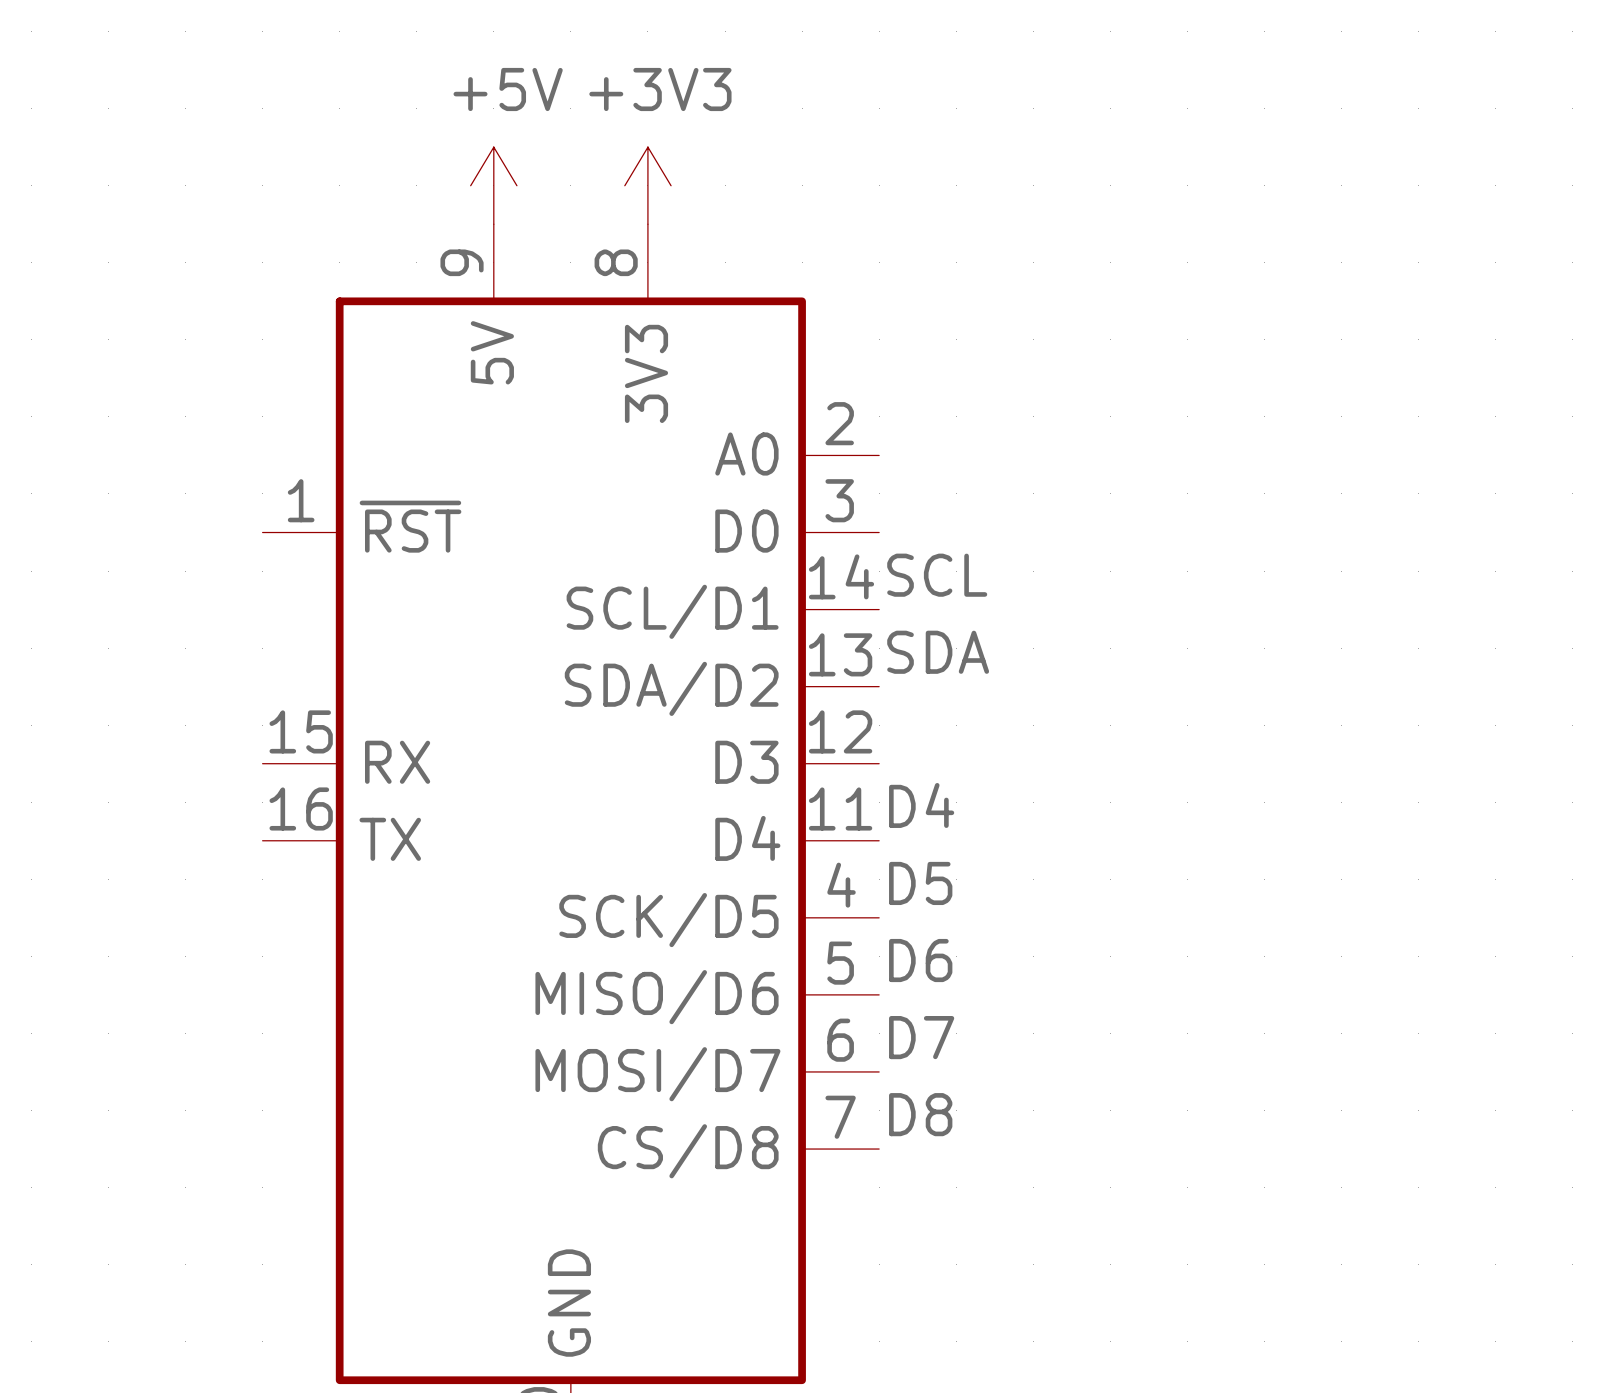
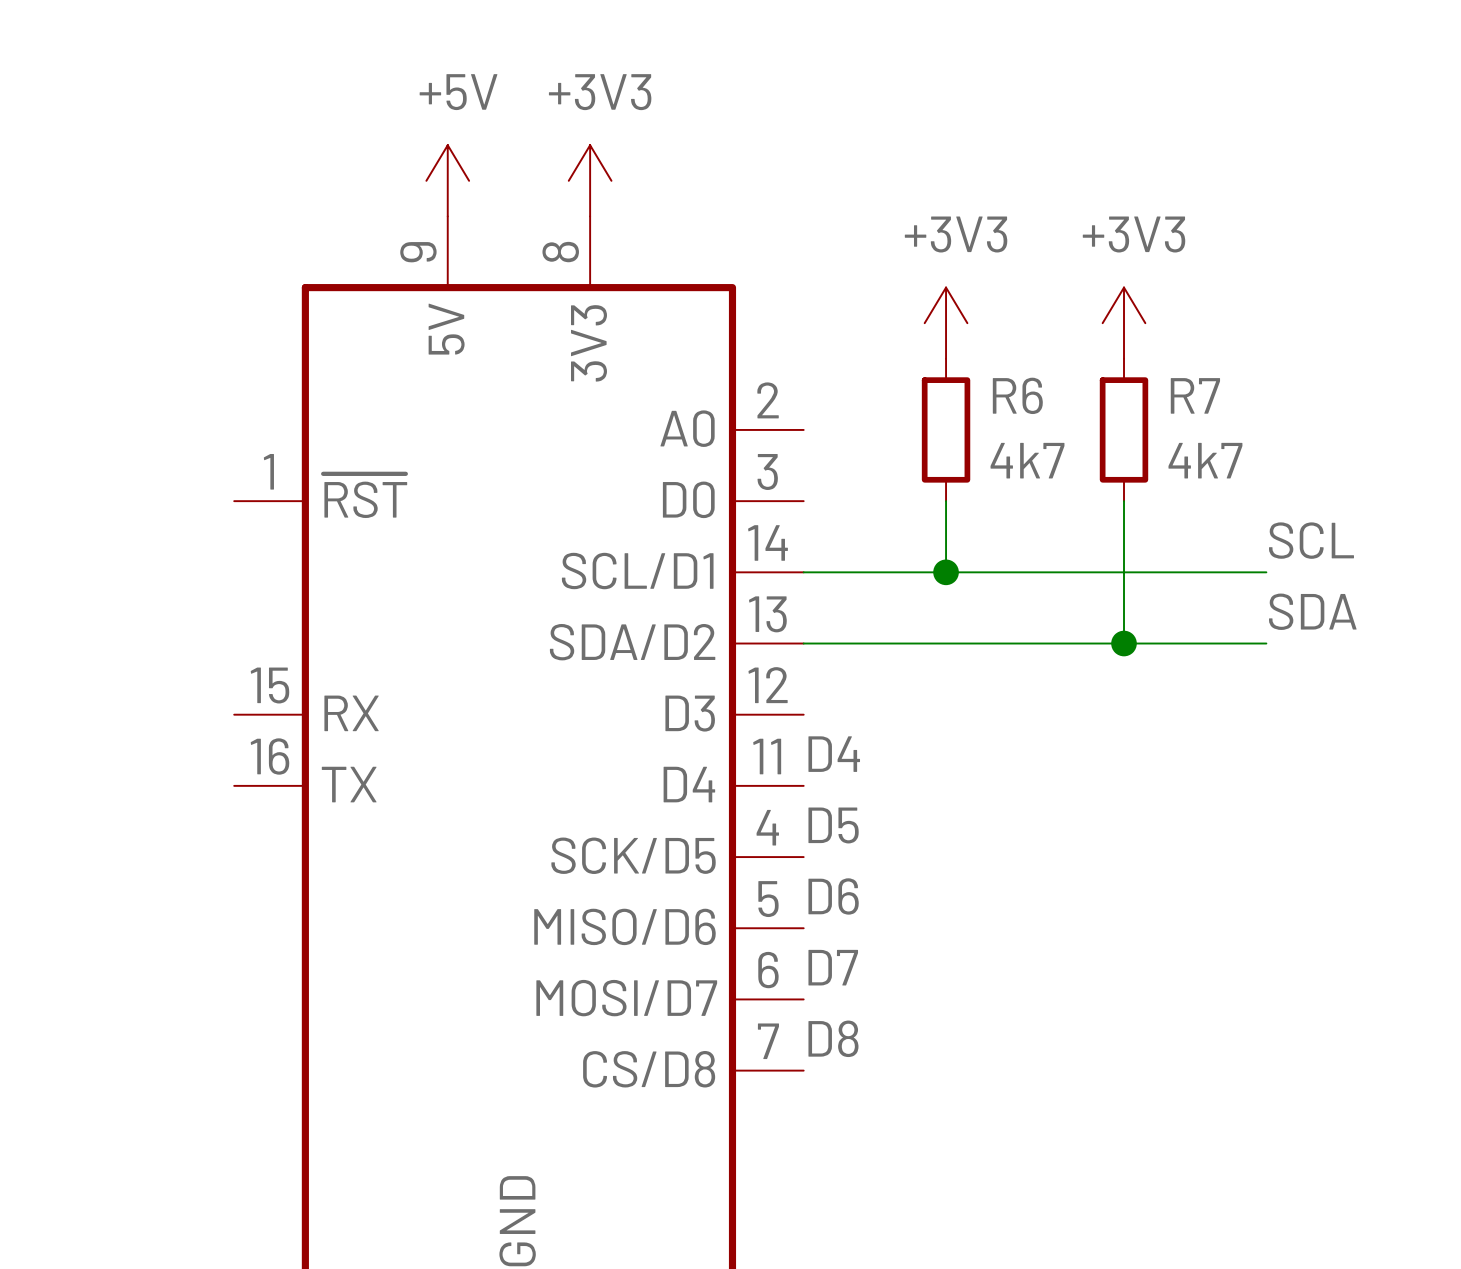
power symbol: none -> +3V3 (946, 323)
power symbol: none -> +3V3 (1124, 323)
R6: none -> 4k7 (946, 429)
R7: none -> 4k7 (1124, 429)
wire: none -> (946, 501) (946, 572)
wire: none -> (1124, 501) (1124, 643)
label position: SCL (937, 575) -> SCL (1311, 540)
wire: none -> (803, 572) (1266, 572)
junction: none -> (946, 572)
label position: SDA (938, 652) -> SDA (1312, 611)
wire: none -> (803, 643) (1266, 643)
junction: none -> (1124, 643)

